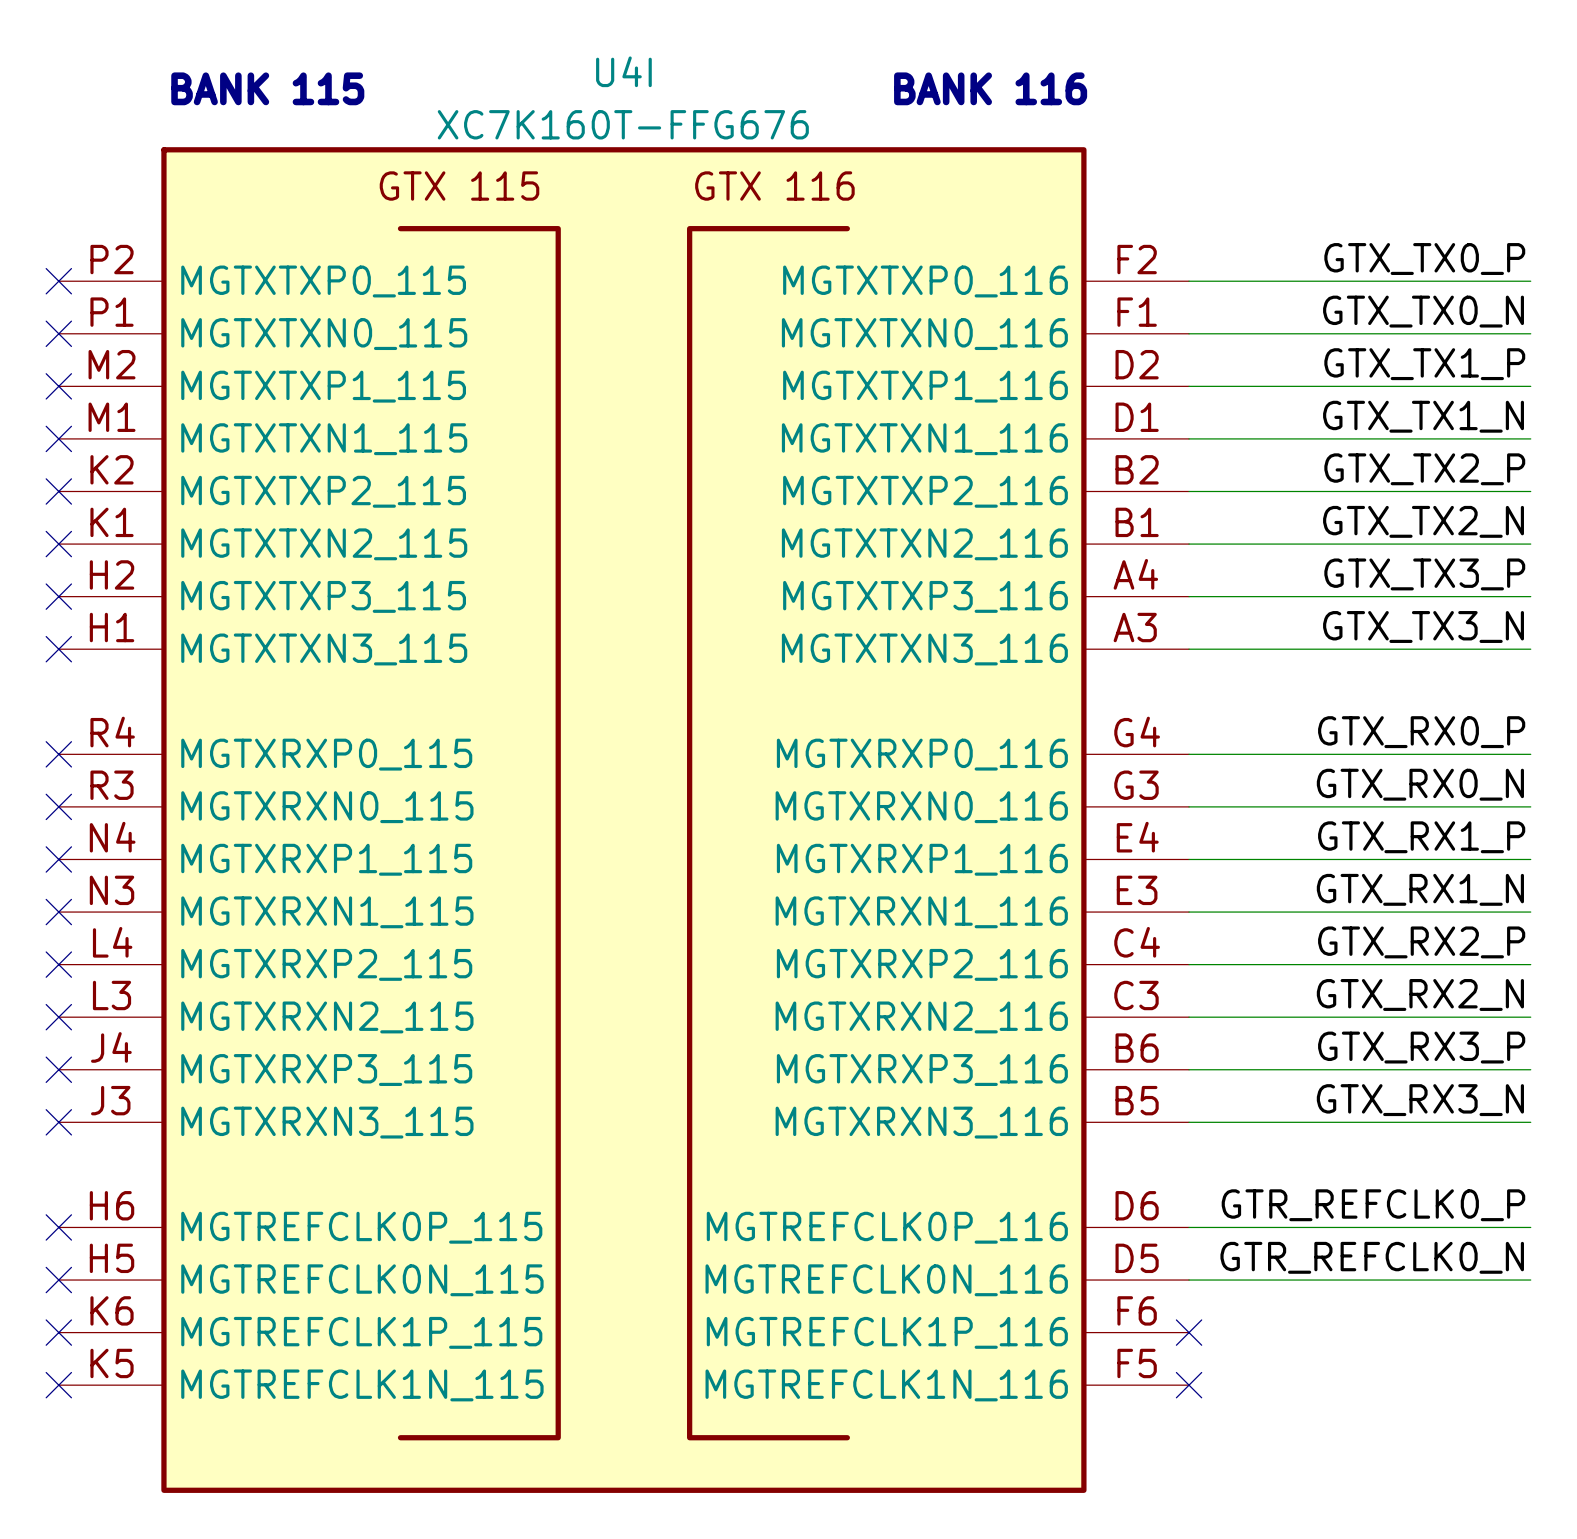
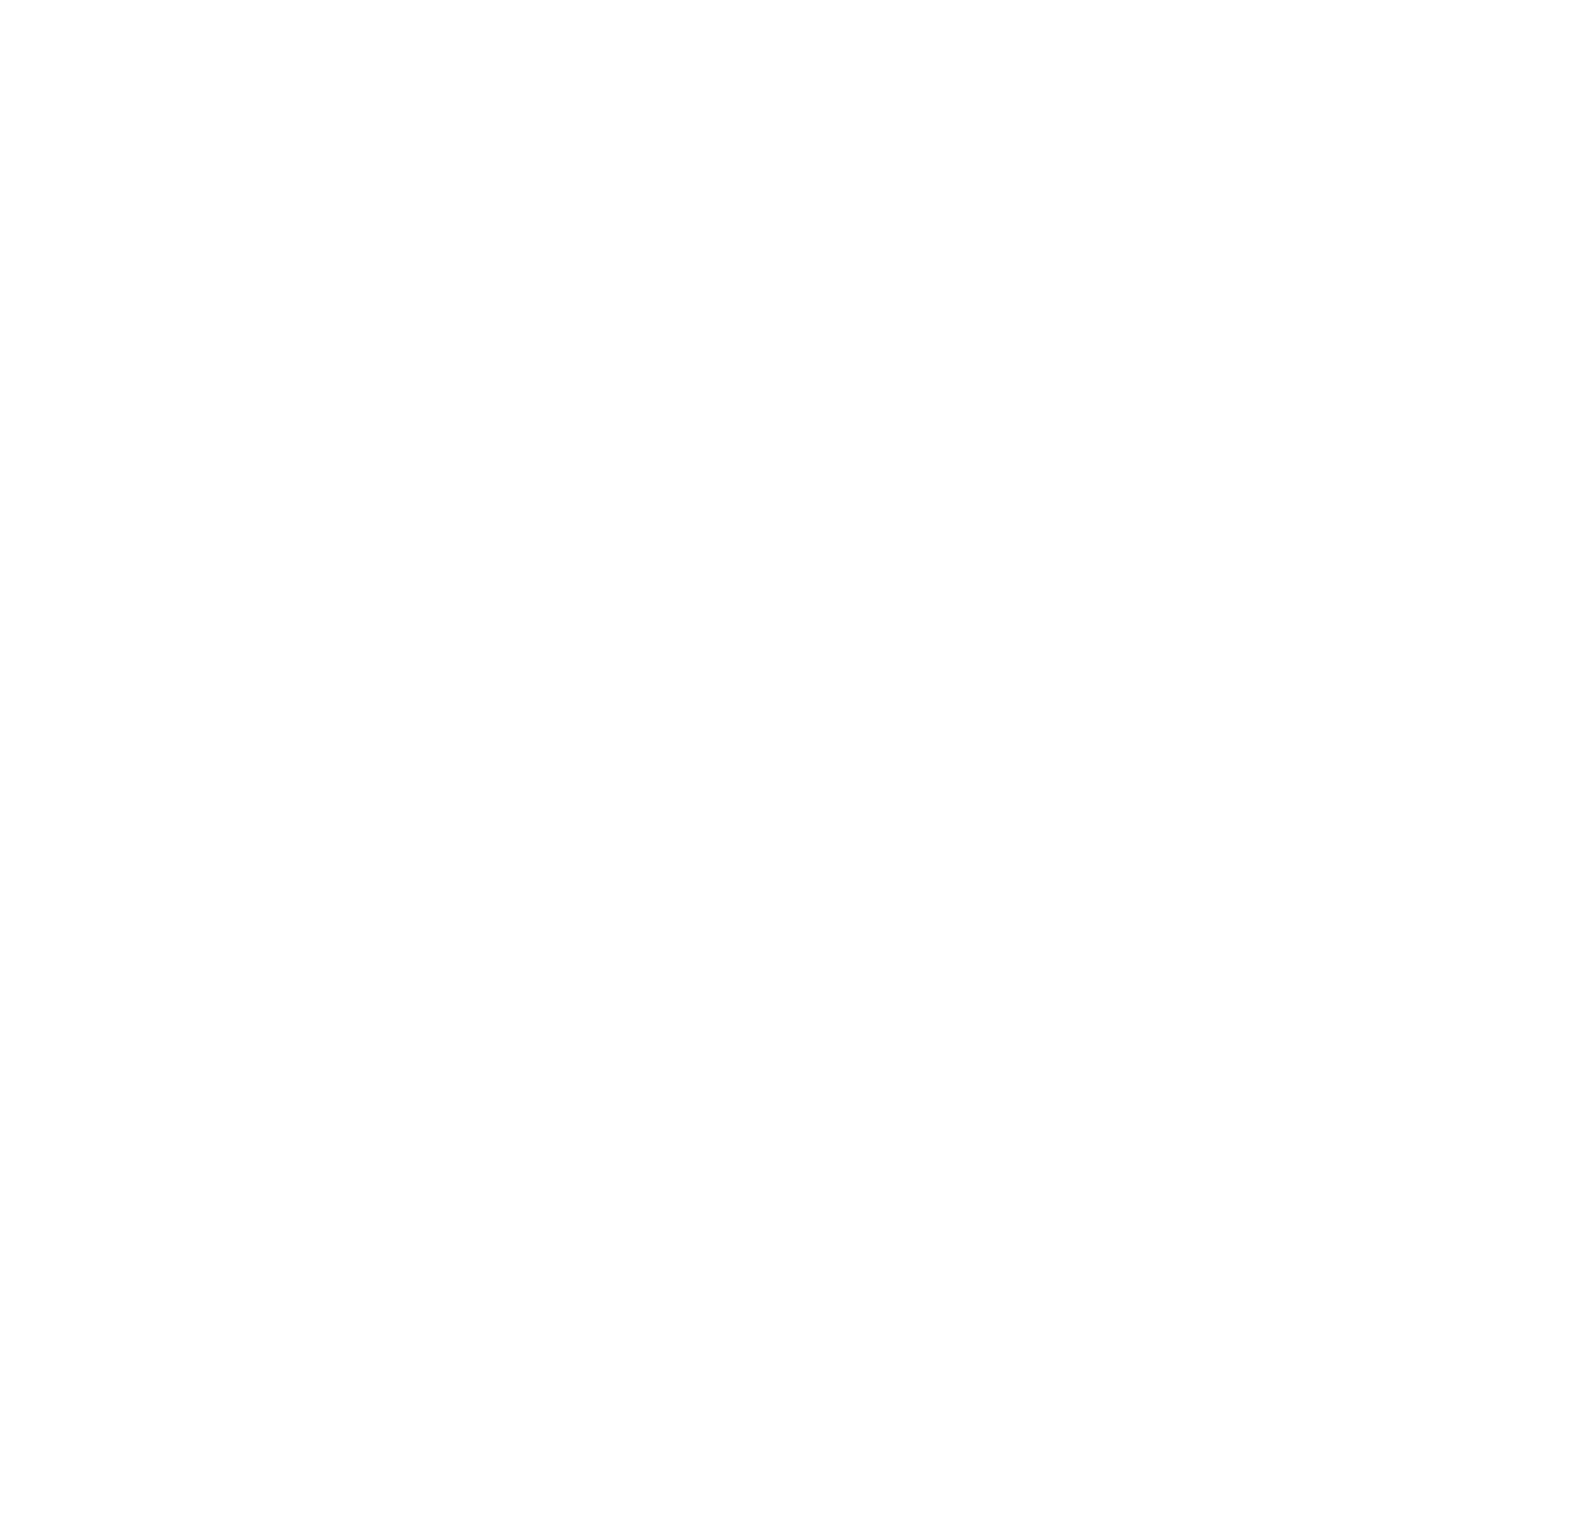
text: BANK 115 (267, 88) -> none
text: BANK 116 (990, 88) -> none
label: GTX_TX0_P (1424, 259) -> none
no-connect mark: (58, 281) -> none
wire: (1189, 281) (1530, 281) -> none
label: GTX_TX0_N (1423, 311) -> none
no-connect mark: (58, 333) -> none
wire: (1189, 333) (1530, 333) -> none
label: GTX_TX1_P (1424, 364) -> none
no-connect mark: (58, 386) -> none
wire: (1189, 386) (1530, 386) -> none
label: GTX_TX1_N (1423, 416) -> none
no-connect mark: (58, 438) -> none
wire: (1189, 438) (1530, 438) -> none
label: GTX_TX2_P (1424, 469) -> none
no-connect mark: (58, 491) -> none
wire: (1189, 491) (1530, 491) -> none
label: GTX_TX2_N (1423, 521) -> none
no-connect mark: (58, 544) -> none
wire: (1189, 544) (1530, 544) -> none
label: GTX_TX3_P (1424, 574) -> none
no-connect mark: (58, 596) -> none
wire: (1189, 596) (1530, 596) -> none
label: GTX_TX3_N (1423, 626) -> none
no-connect mark: (58, 649) -> none
wire: (1189, 649) (1530, 649) -> none
label: GTX_RX0_P (1421, 732) -> none
no-connect mark: (58, 754) -> none
wire: (1189, 754) (1530, 754) -> none
label: GTX_RX0_N (1420, 784) -> none
no-connect mark: (58, 806) -> none
wire: (1189, 806) (1530, 806) -> none
U4I: XC7K160T-FFG676 (623, 820) -> none
label: GTX_RX1_P (1421, 837) -> none
no-connect mark: (58, 859) -> none
wire: (1189, 859) (1530, 859) -> none
label: GTX_RX1_N (1420, 889) -> none
no-connect mark: (58, 912) -> none
wire: (1189, 912) (1530, 912) -> none
label: GTX_RX2_P (1421, 942) -> none
no-connect mark: (58, 964) -> none
wire: (1189, 964) (1530, 964) -> none
label: GTX_RX2_N (1420, 994) -> none
no-connect mark: (58, 1017) -> none
wire: (1189, 1017) (1530, 1017) -> none
label: GTX_RX3_P (1421, 1047) -> none
no-connect mark: (58, 1069) -> none
wire: (1189, 1069) (1530, 1069) -> none
label: GTX_RX3_N (1420, 1100) -> none
no-connect mark: (58, 1122) -> none
wire: (1189, 1122) (1530, 1122) -> none
label: GTR_REFCLK0_P (1373, 1205) -> none
no-connect mark: (58, 1227) -> none
wire: (1189, 1227) (1530, 1227) -> none
label: GTR_REFCLK0_N (1372, 1257) -> none
no-connect mark: (58, 1280) -> none
wire: (1189, 1280) (1530, 1280) -> none
no-connect mark: (58, 1332) -> none
no-connect mark: (1189, 1332) -> none
no-connect mark: (58, 1385) -> none
no-connect mark: (1189, 1385) -> none

